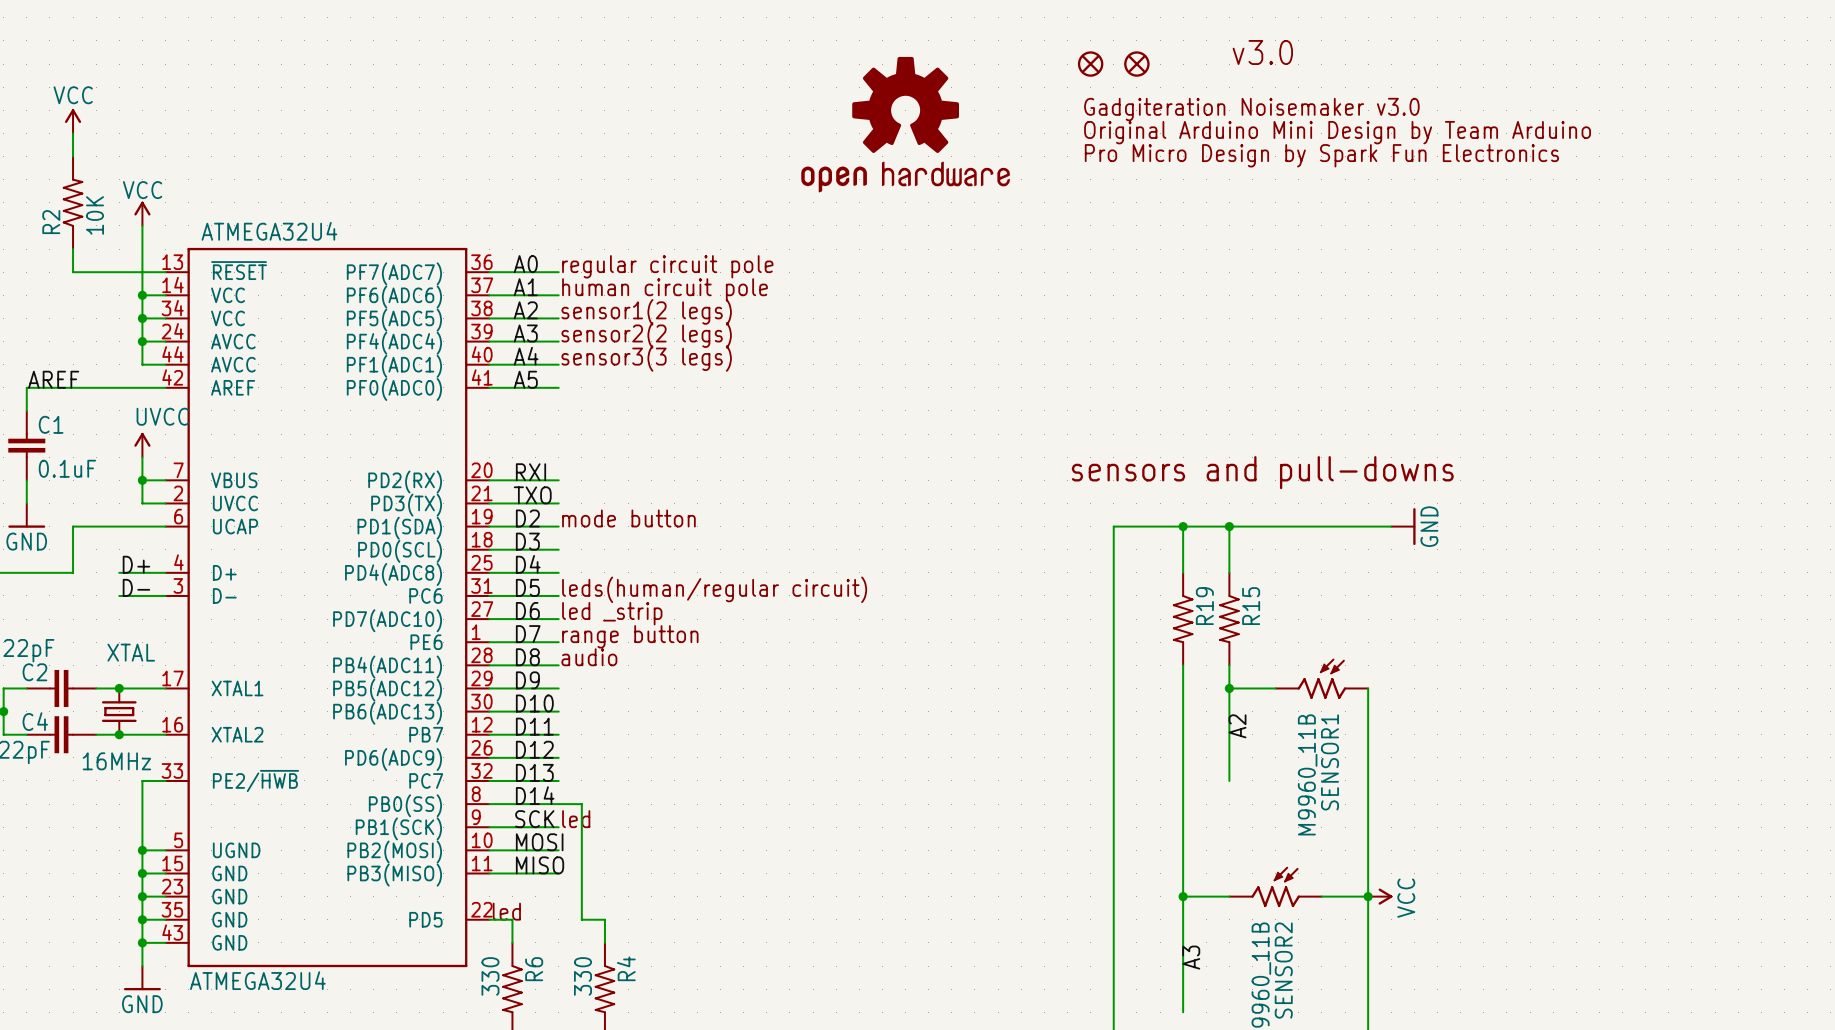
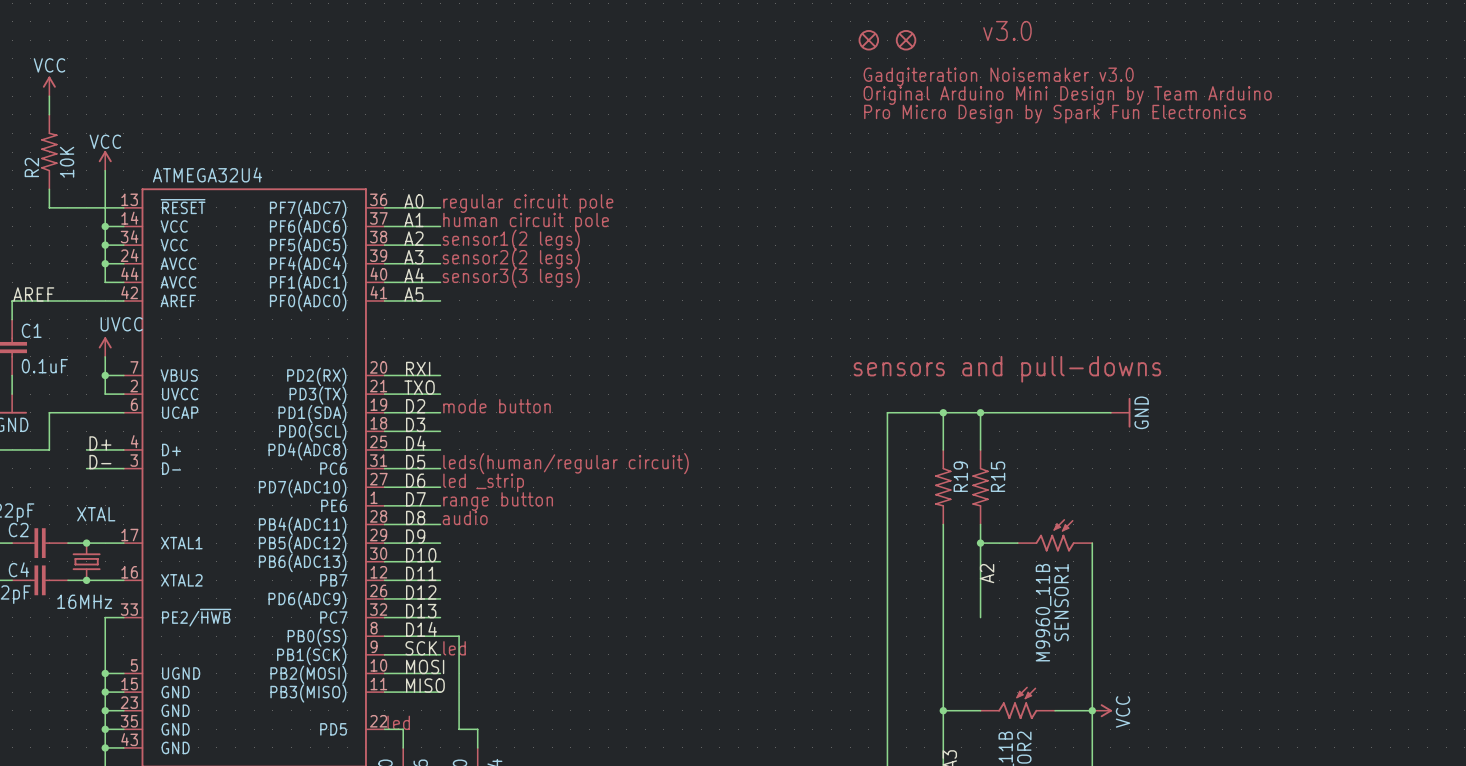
part: (905, 124) -> none

